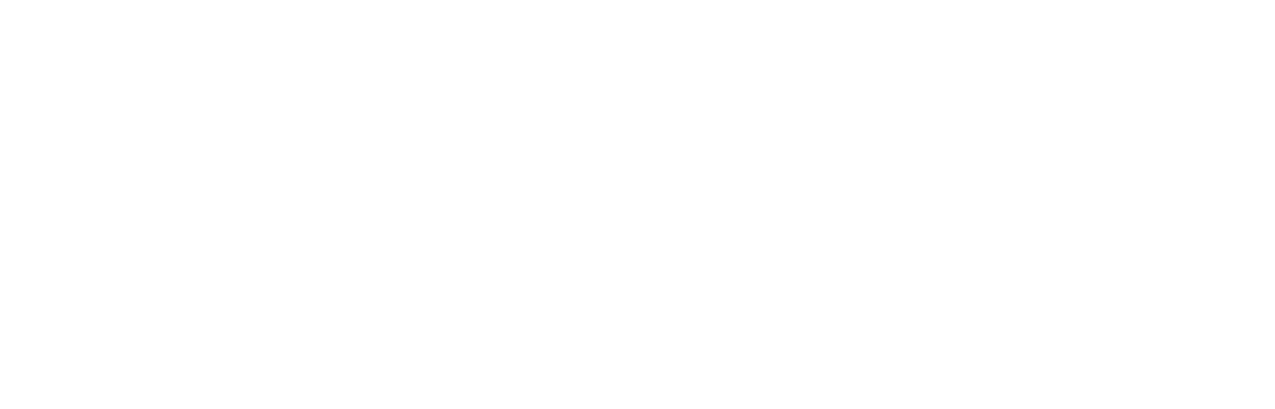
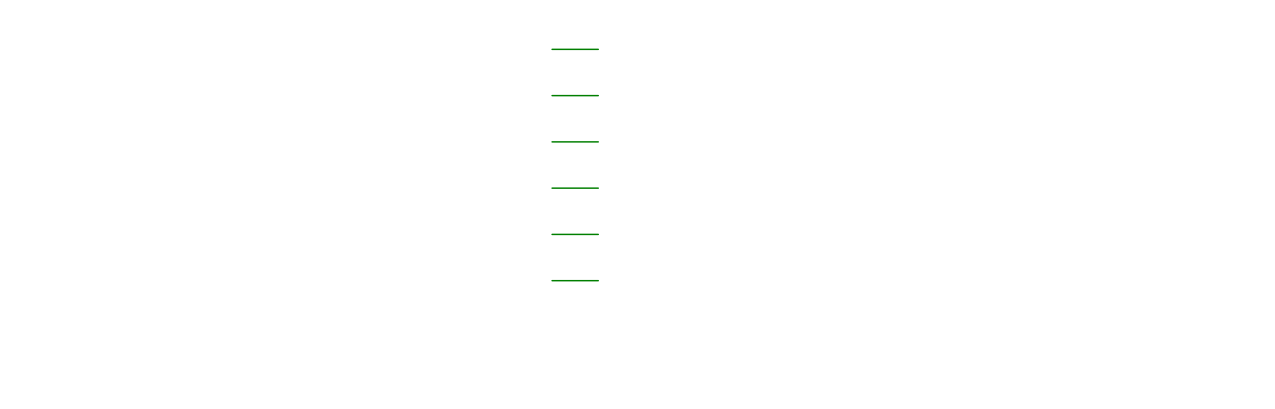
wire: none -> (552, 49) (598, 49)
wire: none -> (552, 95) (598, 95)
wire: none -> (552, 141) (598, 141)
wire: none -> (552, 188) (598, 188)
wire: none -> (552, 234) (598, 234)
wire: none -> (552, 280) (598, 280)

